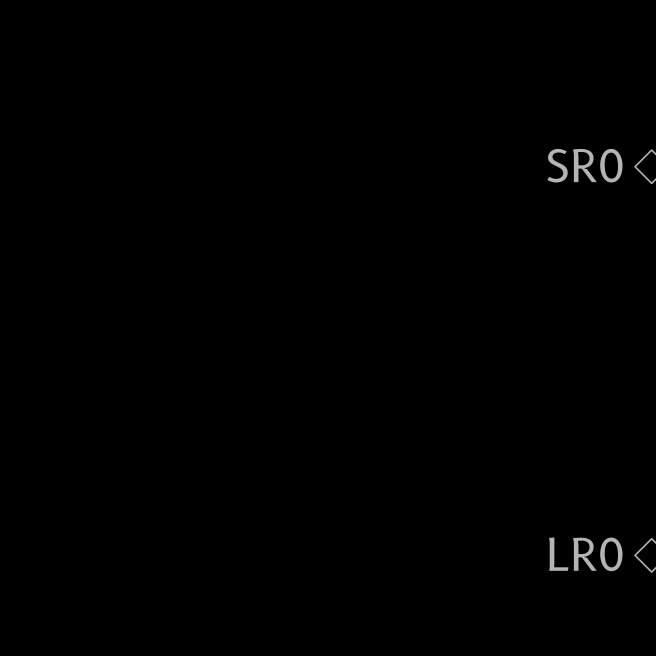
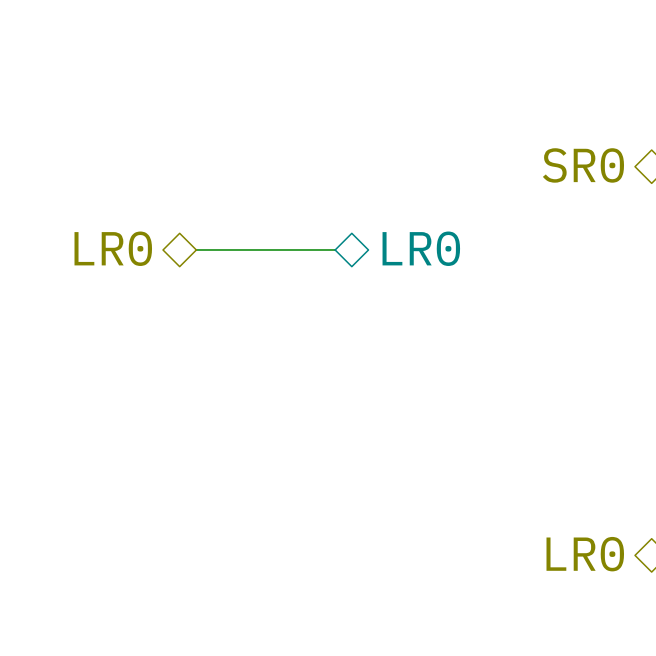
hierarchical label: none -> LR0 (113, 248)
sheet pin: none -> LR0 (421, 248)
wire: none -> (196, 249) (335, 249)

